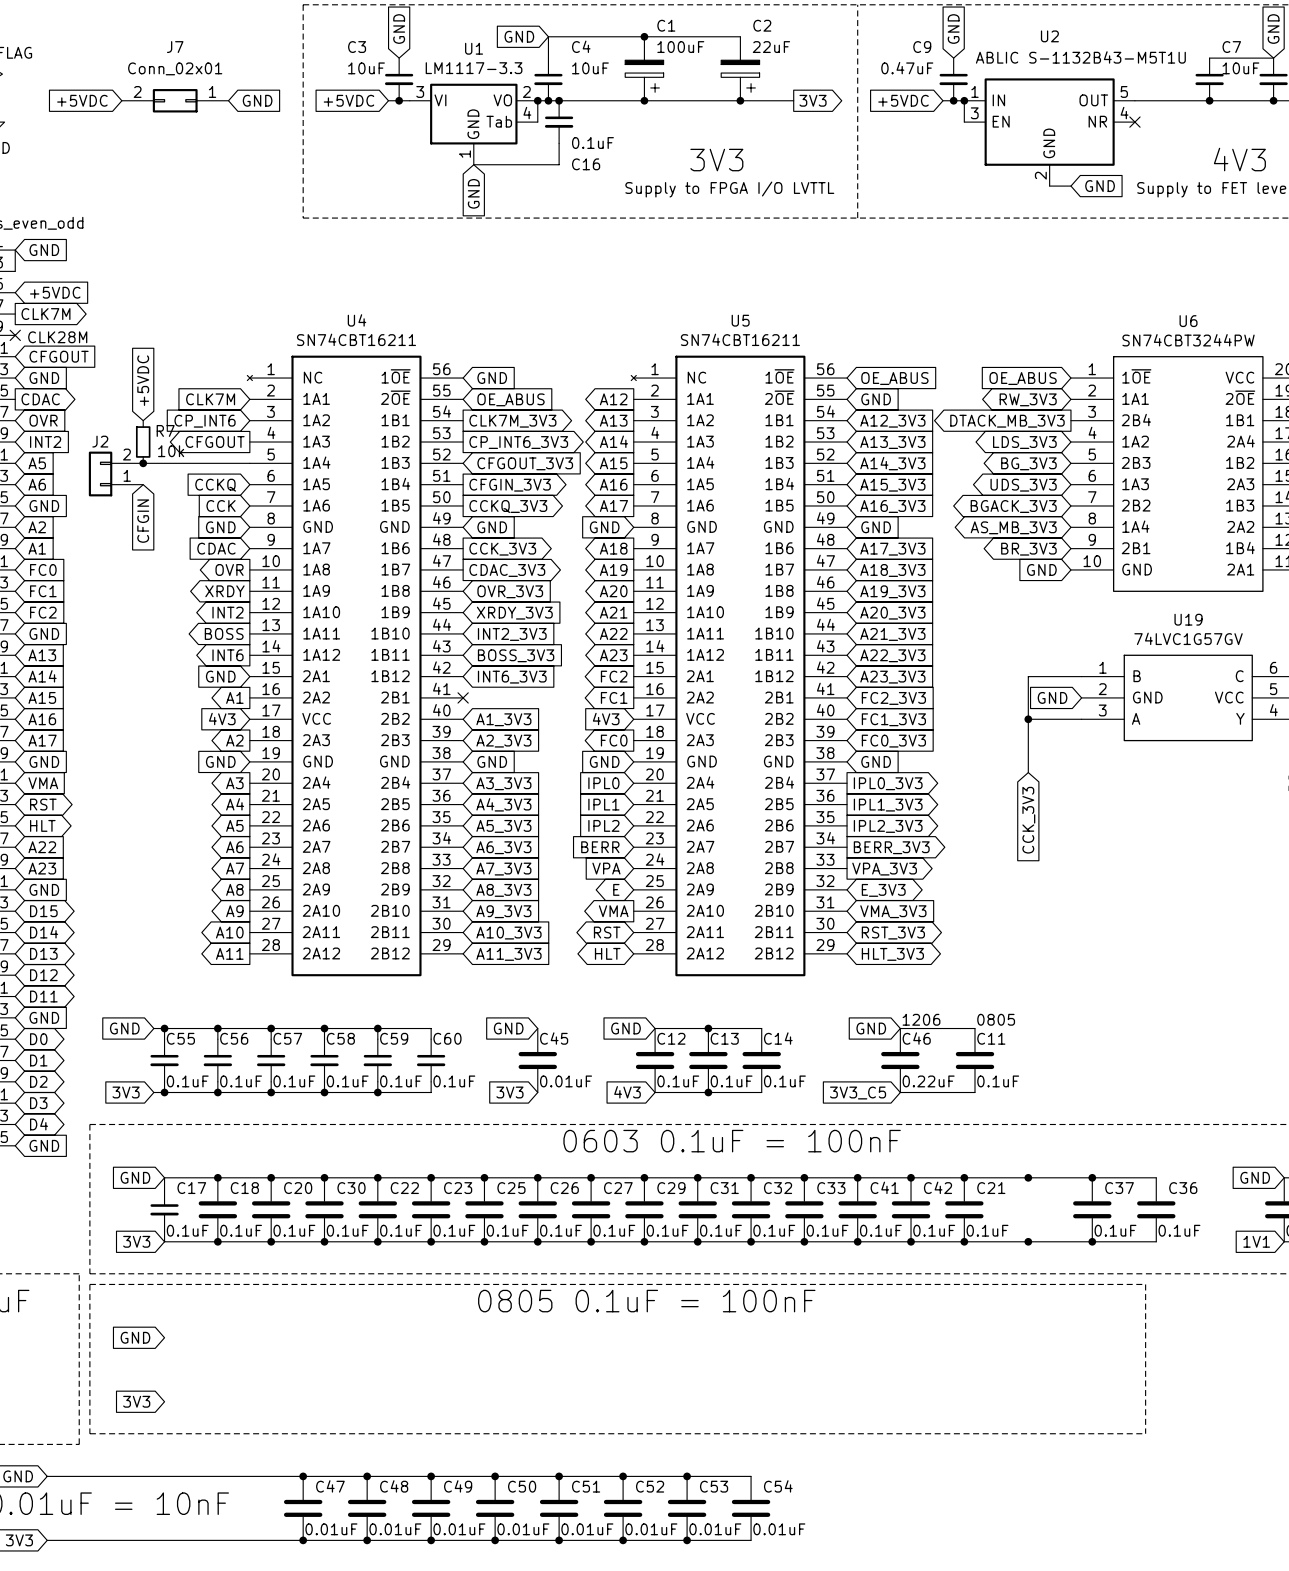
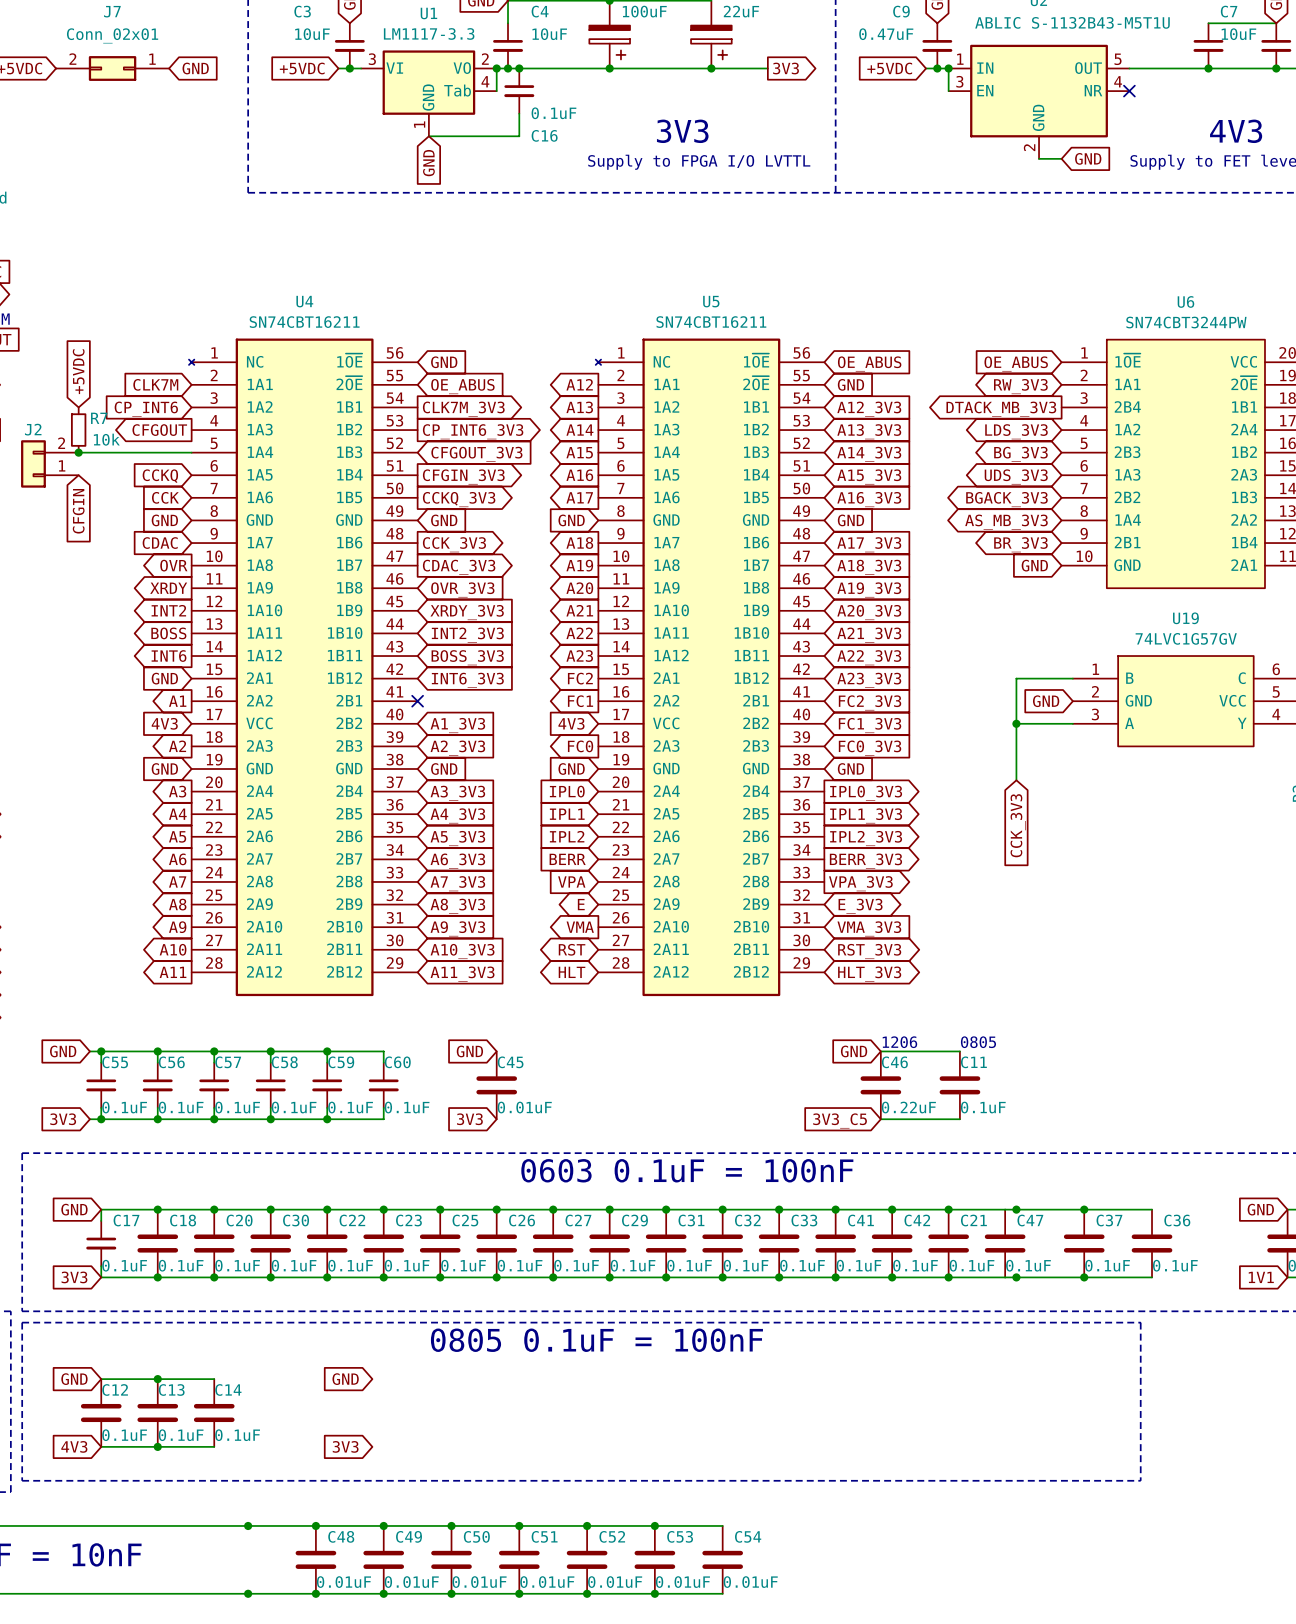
global label: GND (625, 1028) -> none
wire: (655, 1028) (761, 1028) -> none
junction: (708, 1028) -> none
C12 position: (655, 1060) -> (101, 1413)
C13 position: (708, 1060) -> (157, 1413)
C14 position: (761, 1060) -> (214, 1413)
global label: 4V3 (627, 1092) -> none
wire: (655, 1092) (761, 1092) -> none
junction: (708, 1092) -> none
wire: none -> (101, 1379) (214, 1379)
junction: none -> (157, 1379)
global label: none -> GND (345, 1379)
global label: 3V3 (136, 1401) -> 4V3 (74, 1446)
wire: none -> (101, 1446) (214, 1446)
junction: none -> (157, 1446)
global label: none -> 3V3 (345, 1446)
C47 position: (303, 1508) -> (1005, 1243)
C47 value: 0.01uF (331, 1529) -> 0.1uF (1028, 1265)

